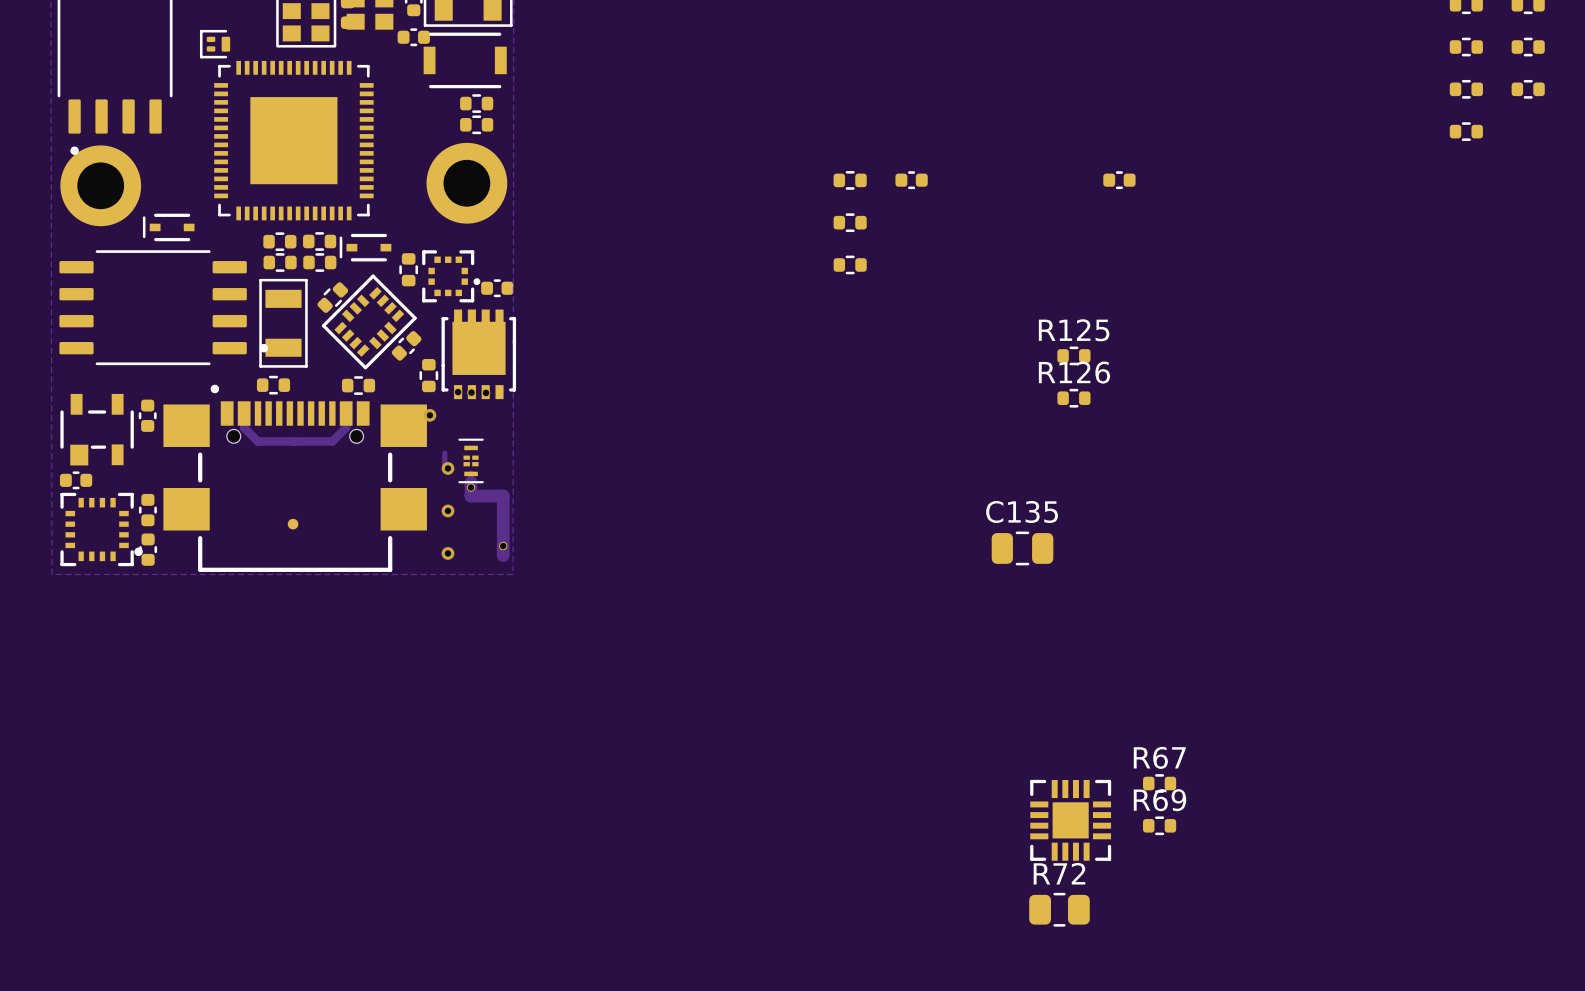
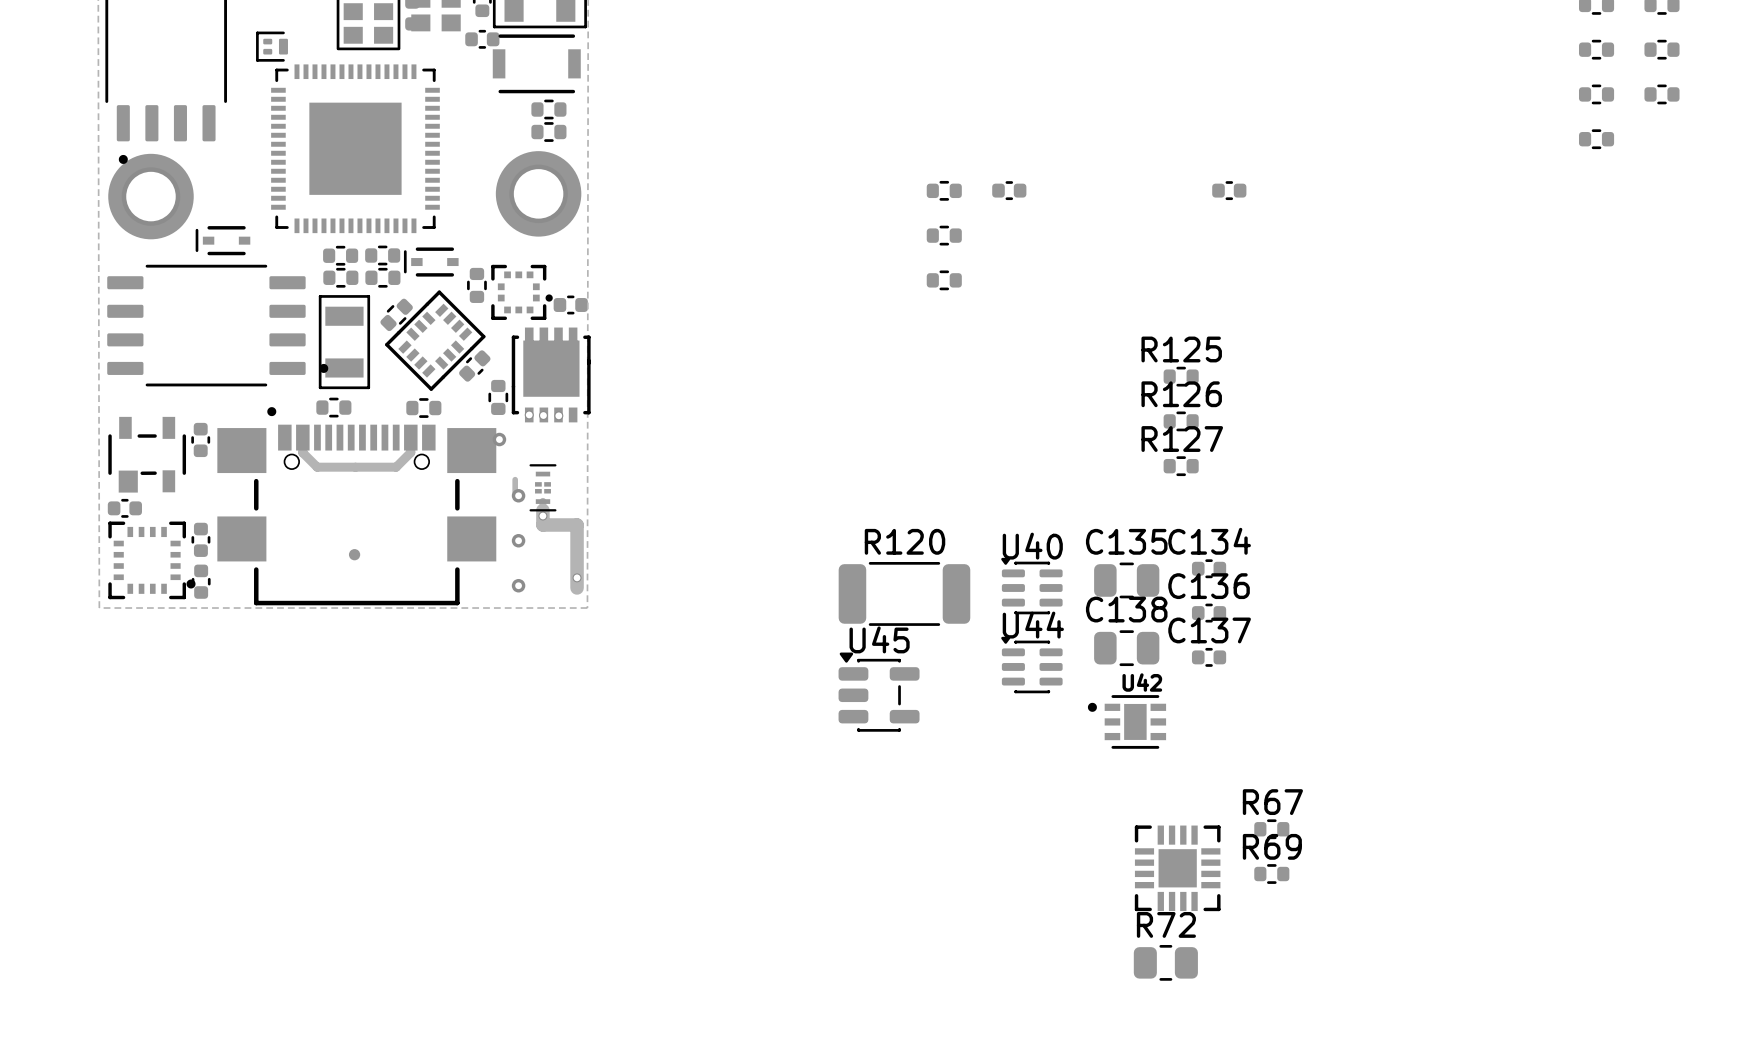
R127: none -> (1181, 466)
C134: none -> (1209, 568)
U40: none -> (1031, 586)
R120: none -> (904, 593)
C136: none -> (1209, 613)
C138: none -> (1126, 648)
C137: none -> (1209, 657)
U44: none -> (1031, 665)
U45: none -> (879, 692)
U42: none -> (1127, 721)

